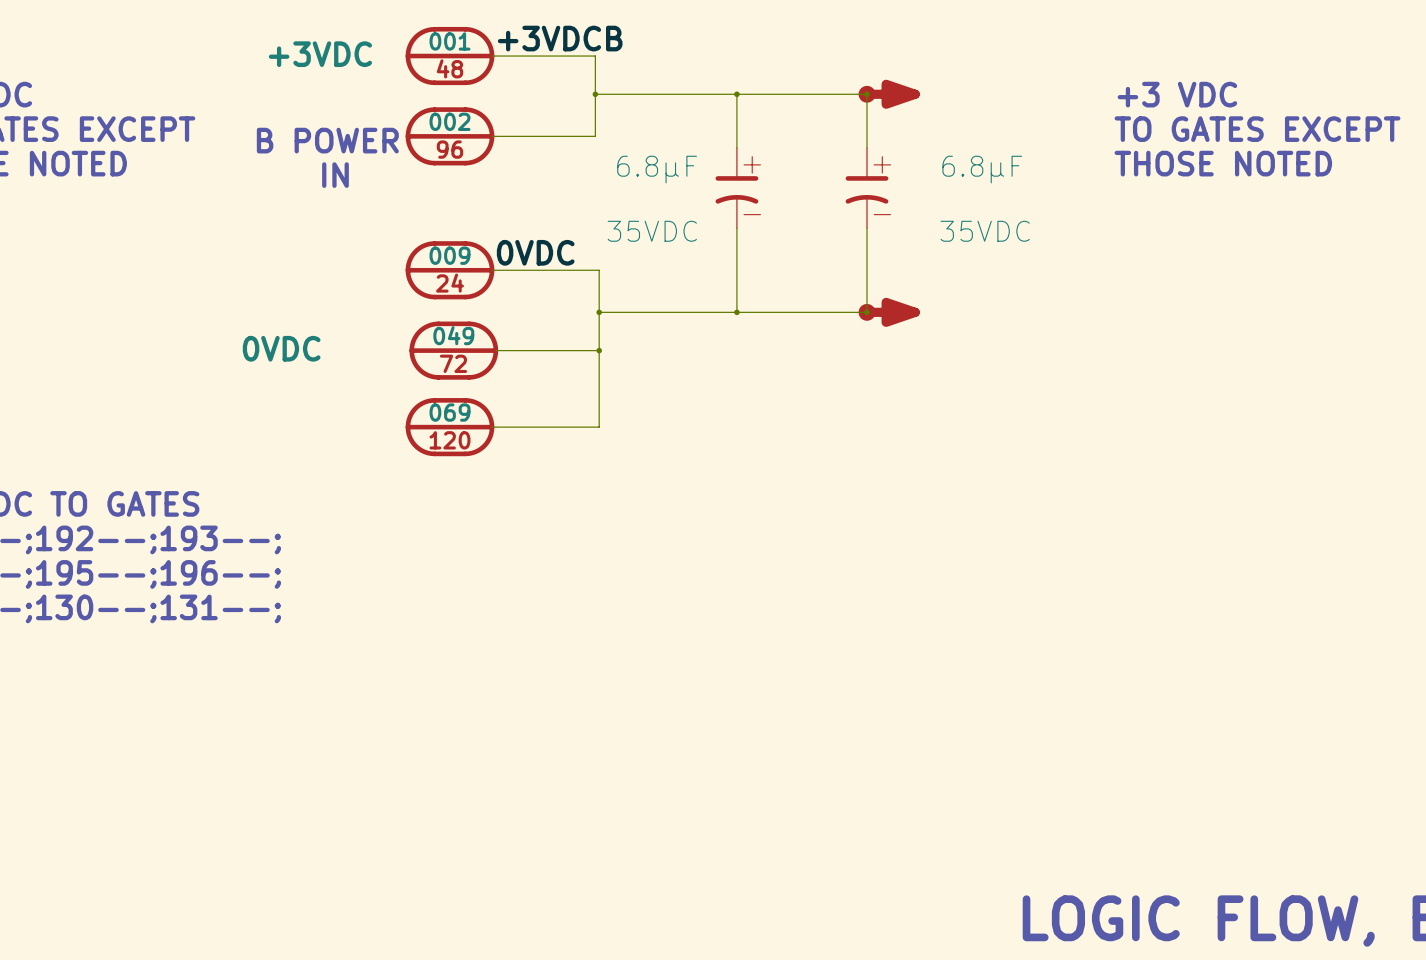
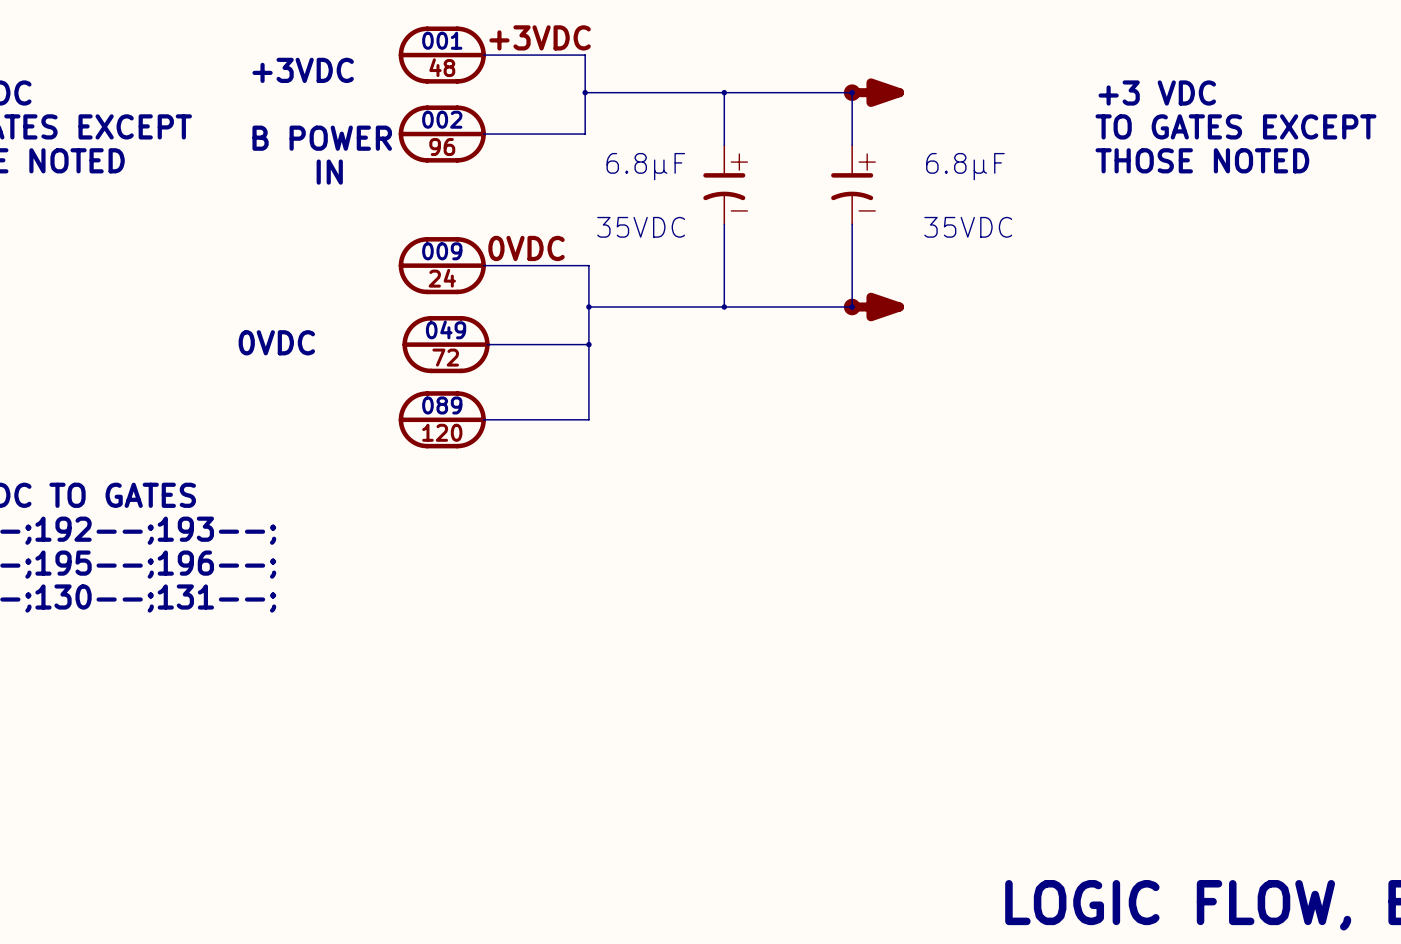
label: +3VDCB (560, 38) -> +3VDC (540, 37)
part text: +3VDC (320, 54) -> none
text: none -> +3VDC (303, 70)
part text: 069 (449, 412) -> 089 (442, 405)

